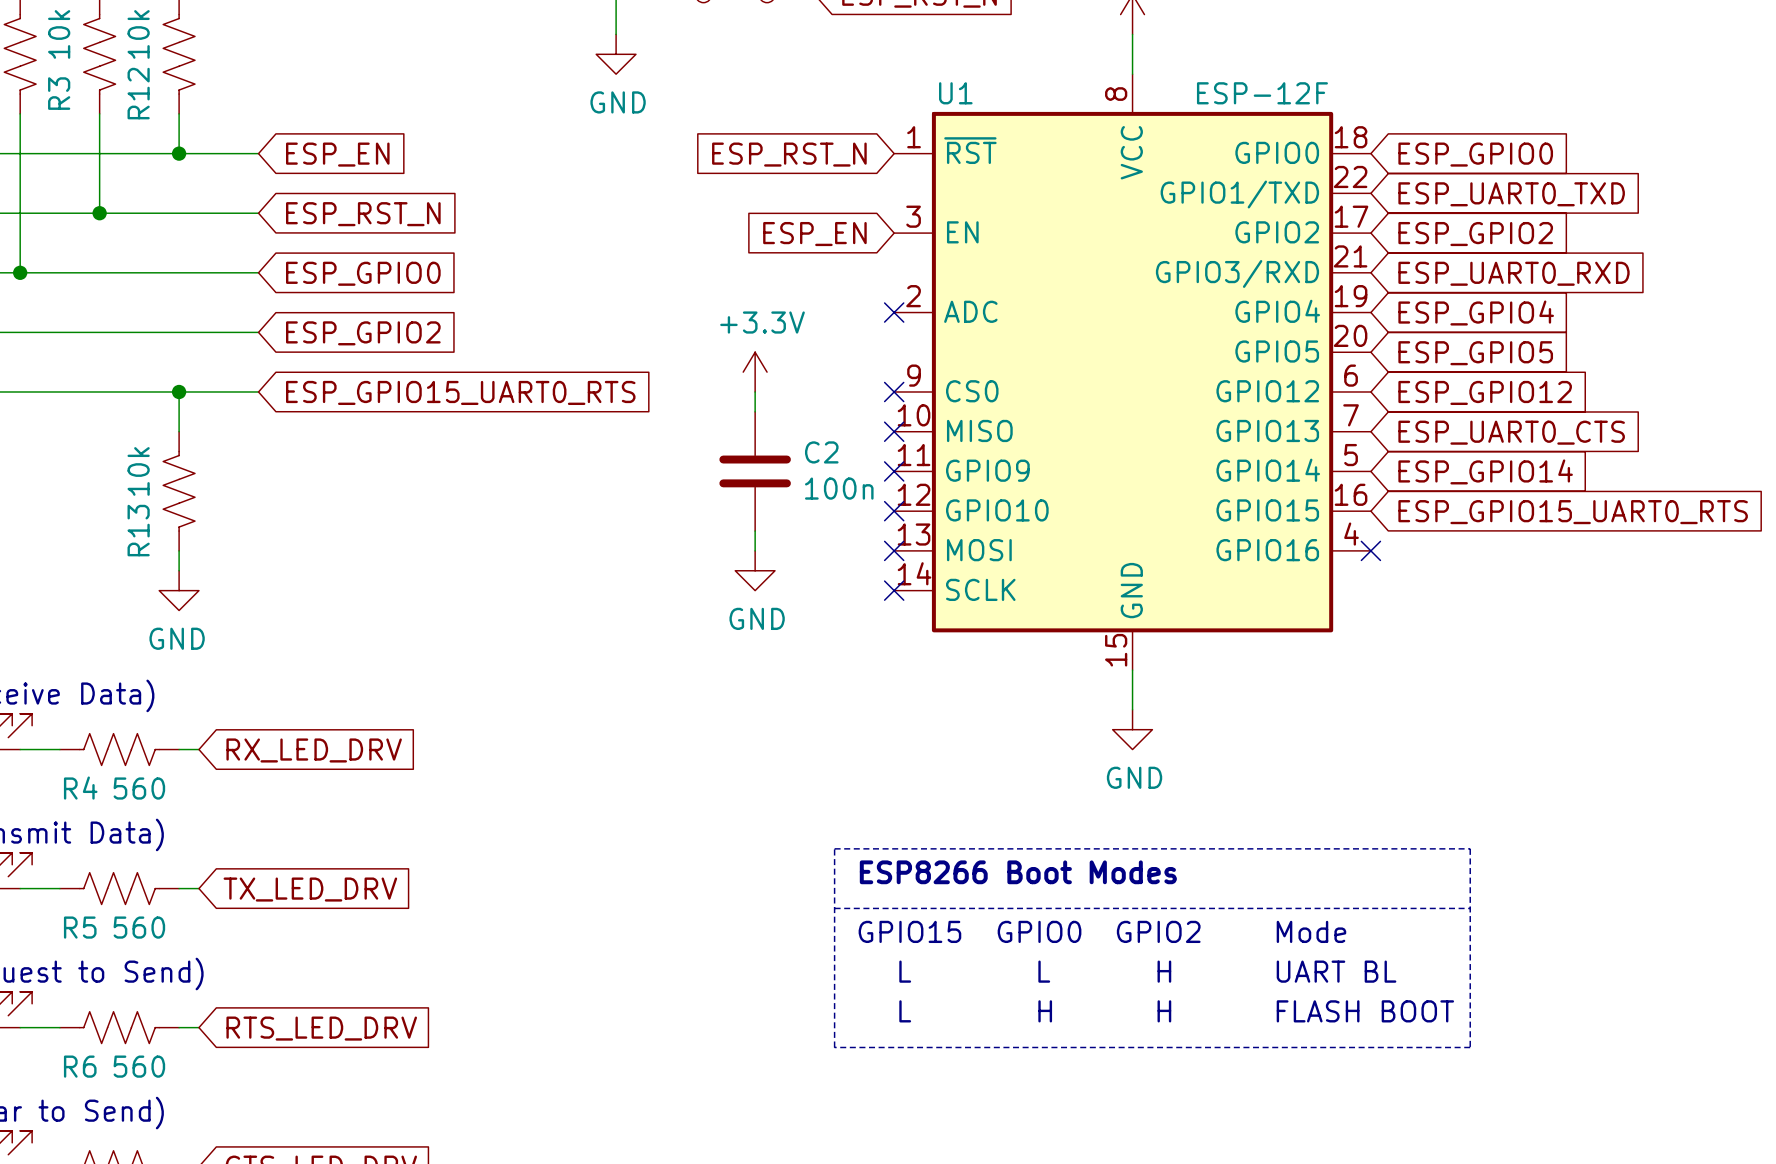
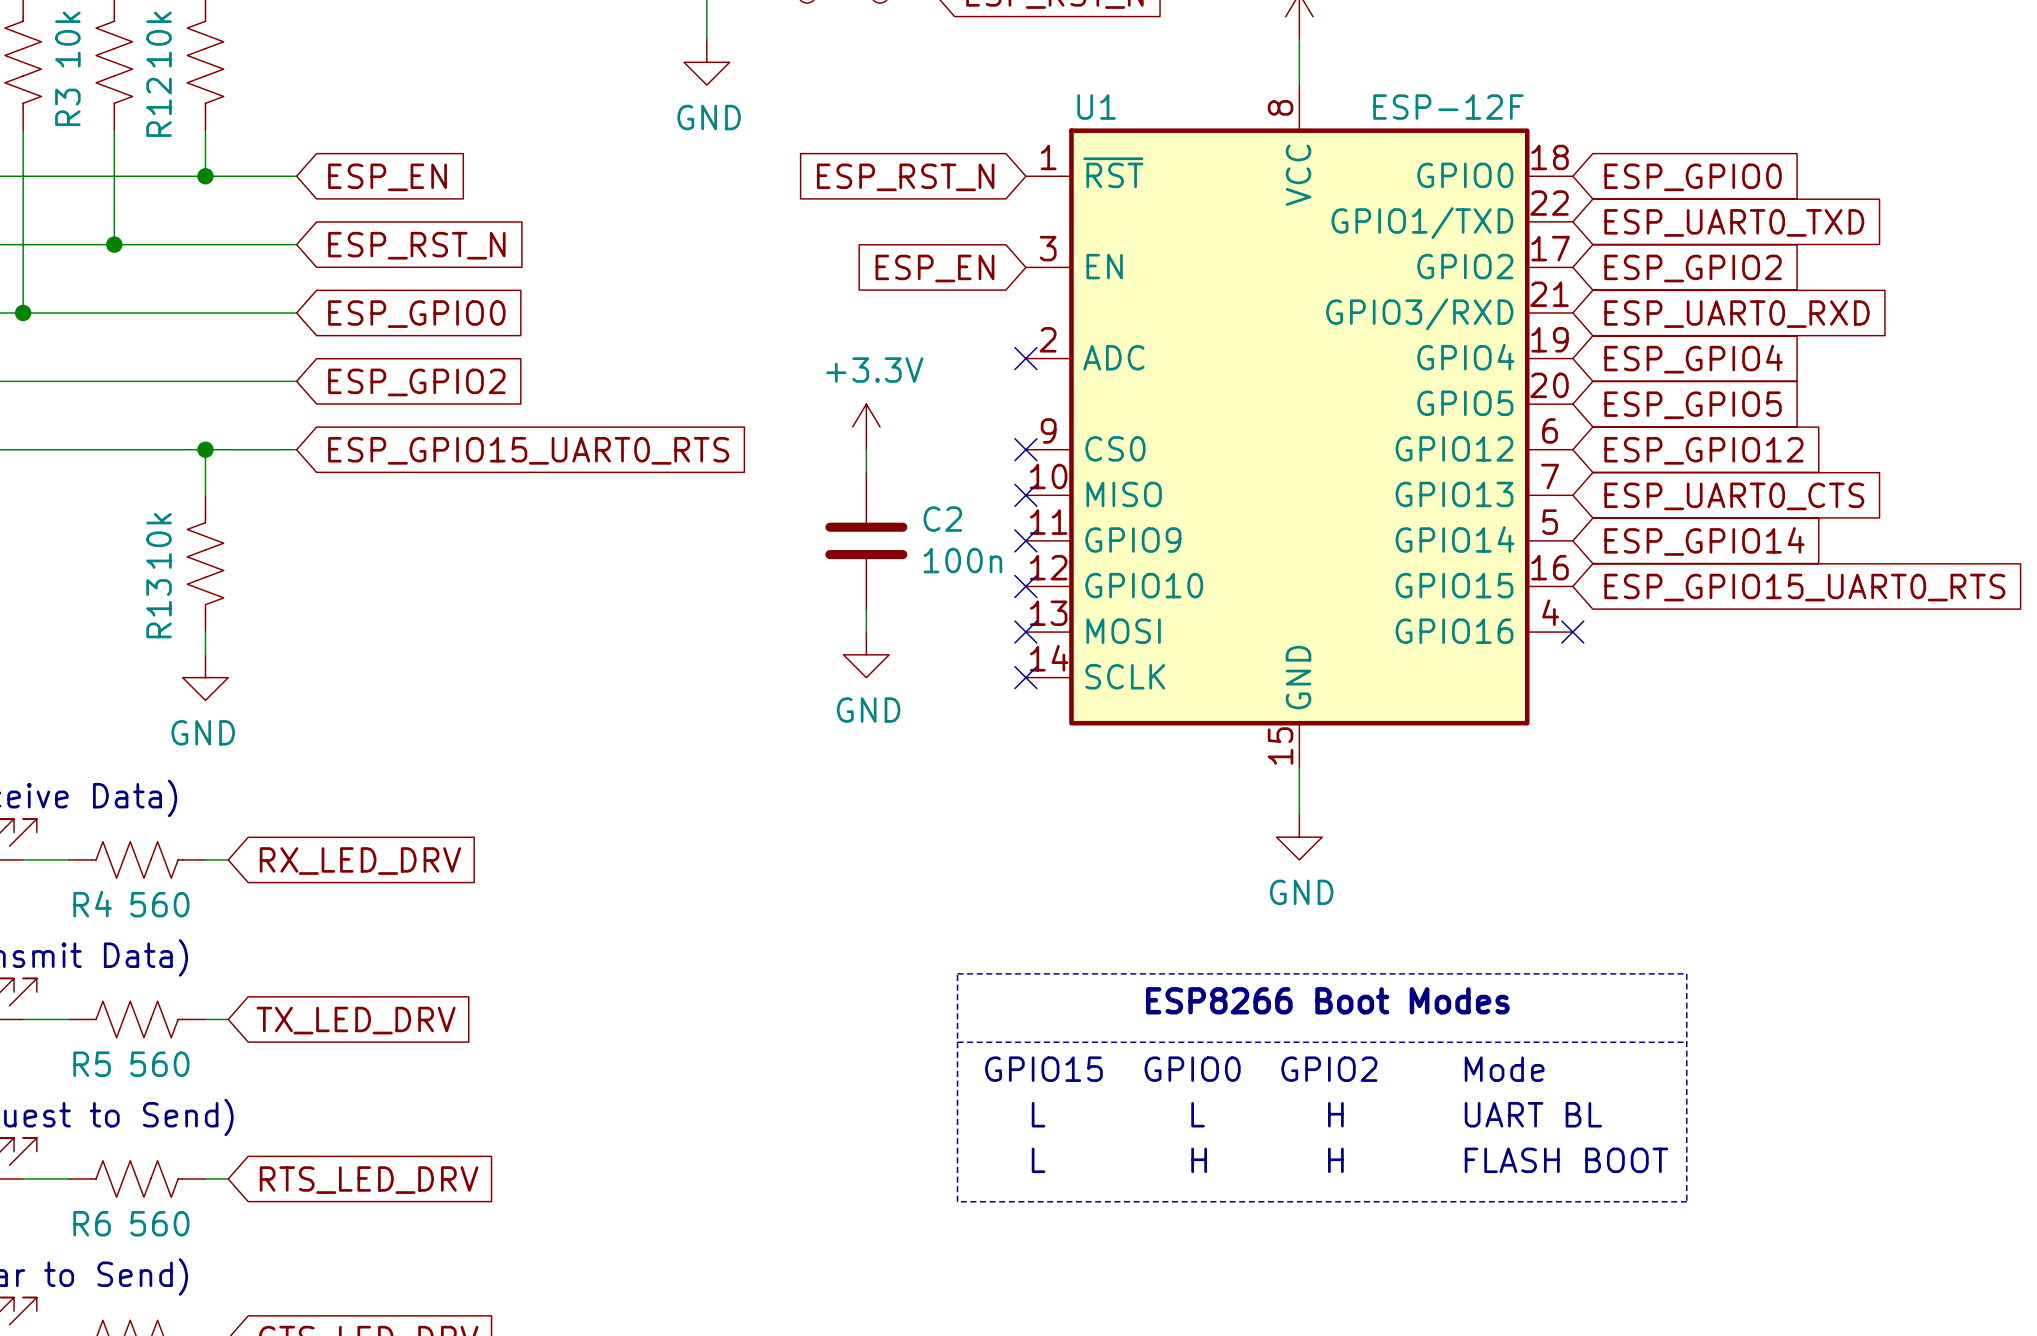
text position: ESP8266 Boot Modes (1018, 872) -> ESP8266 Boot Modes (1327, 1000)

